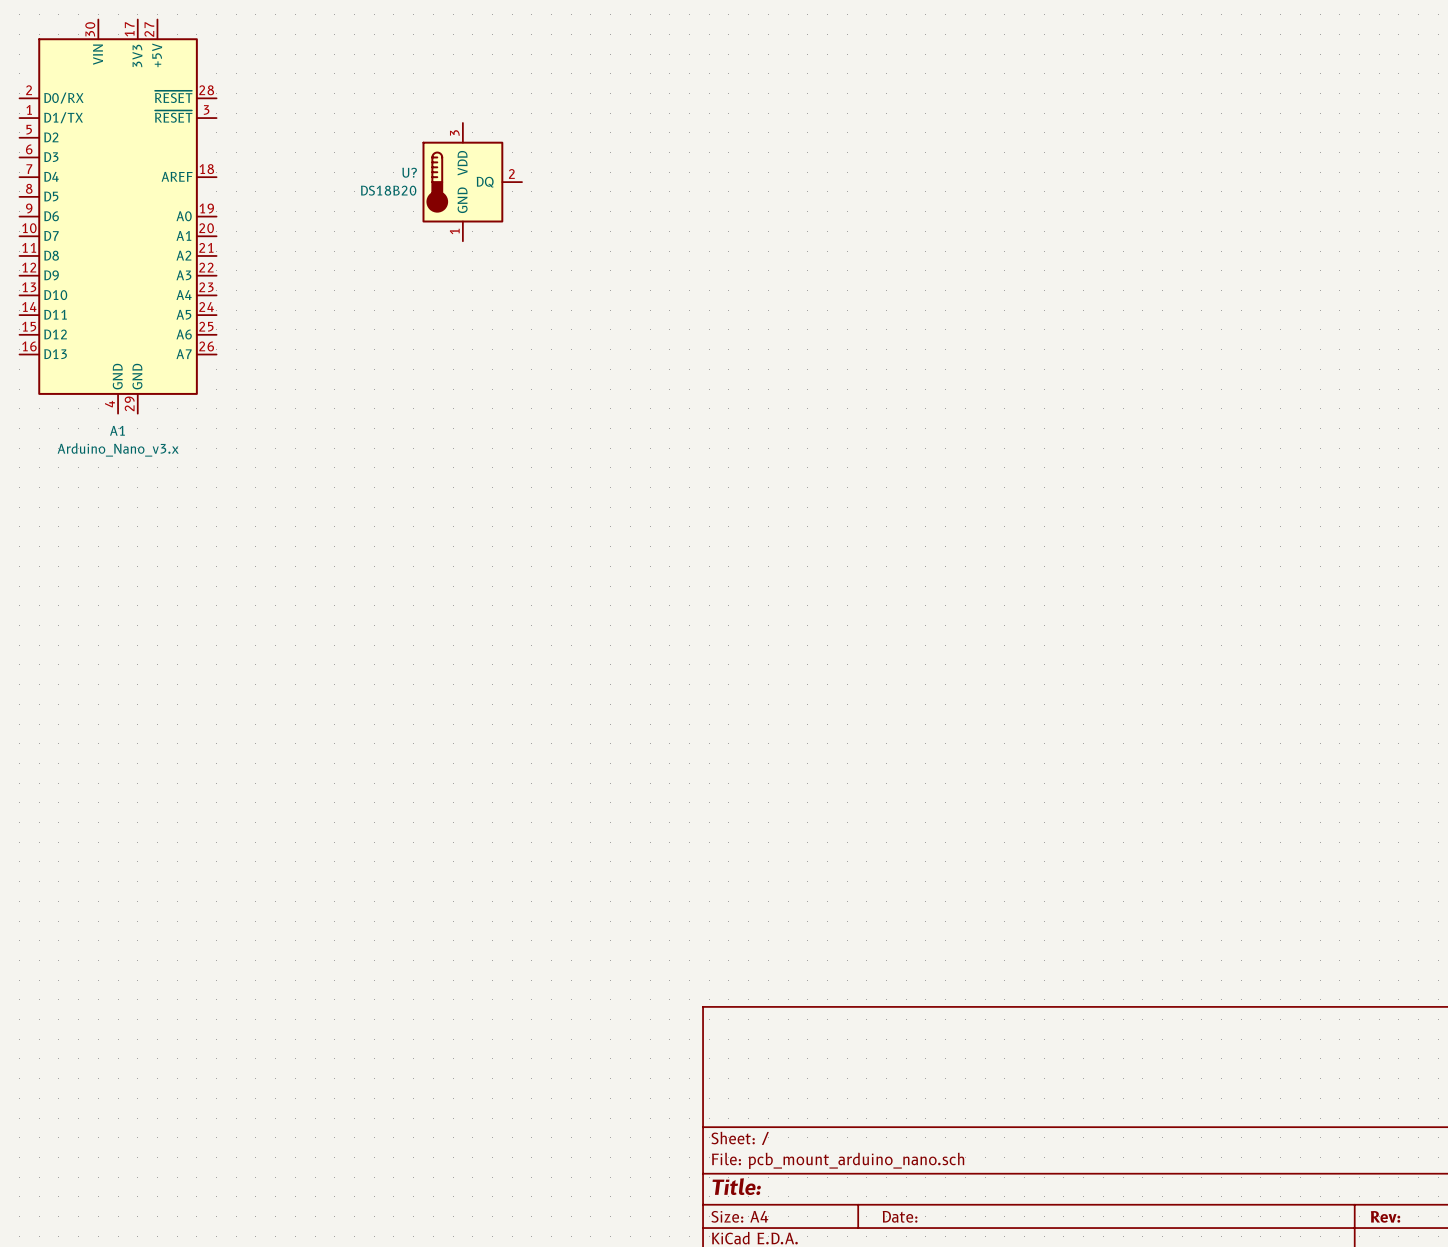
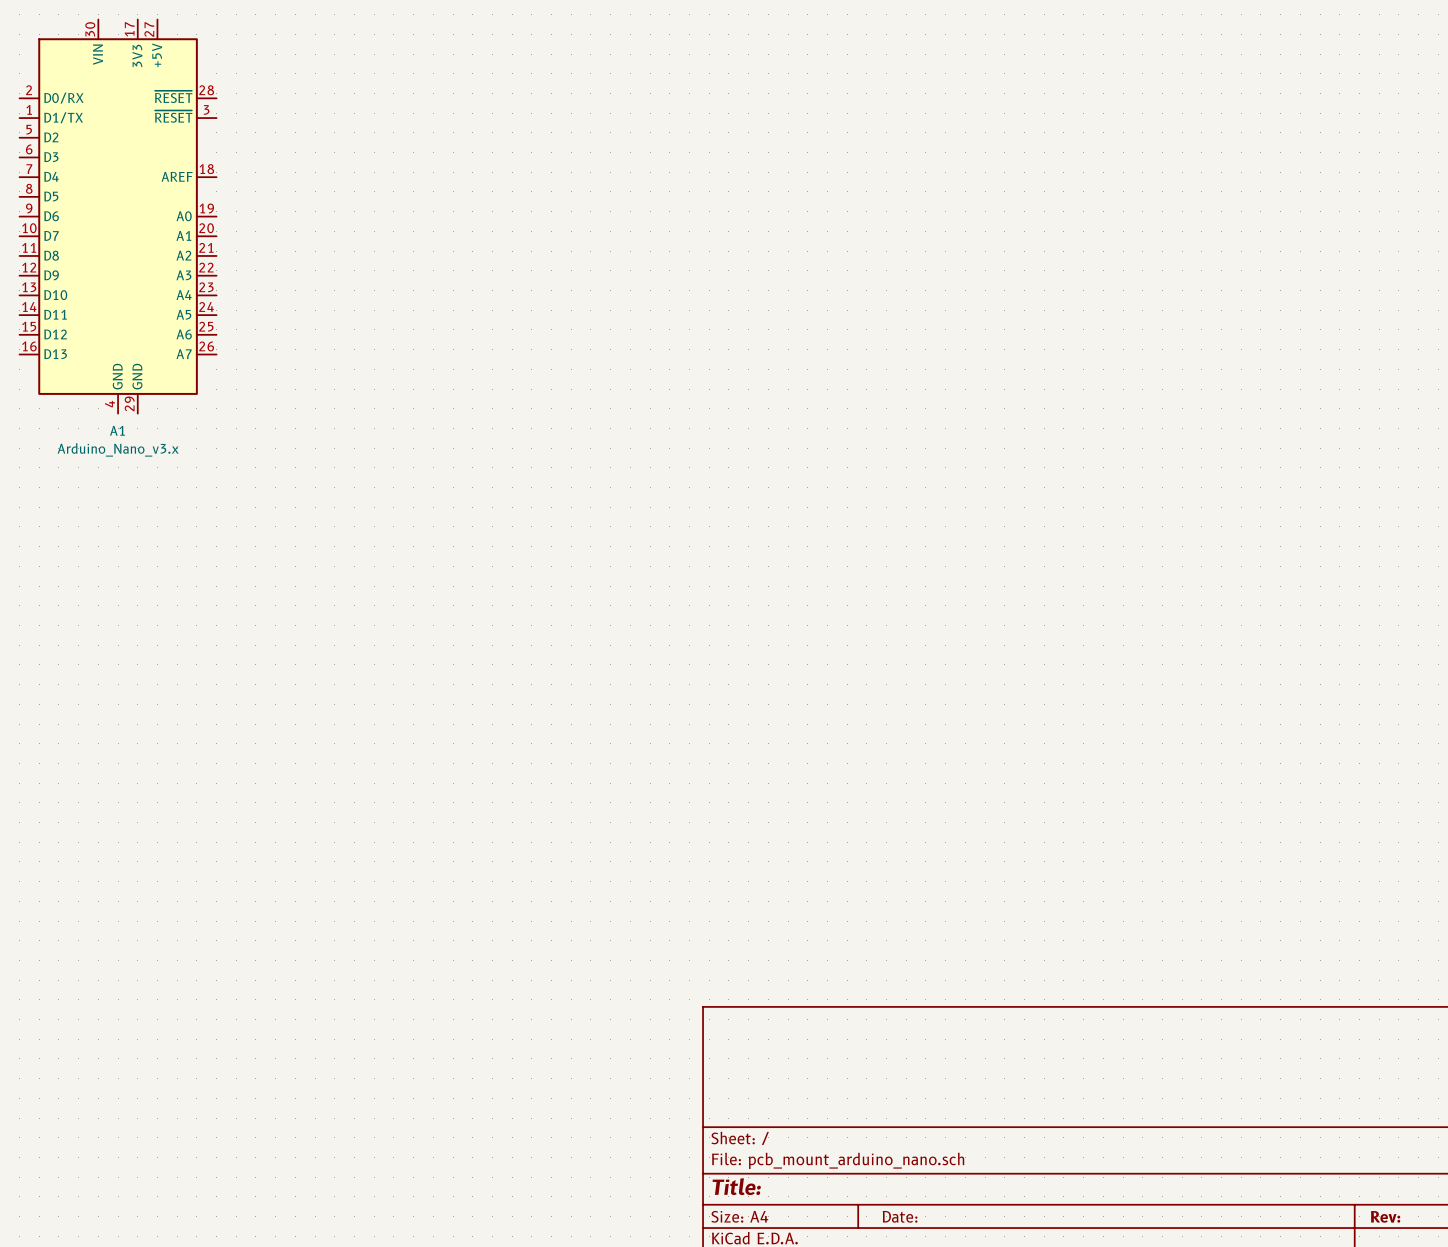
U?: DS18B20 (472, 182) -> none

